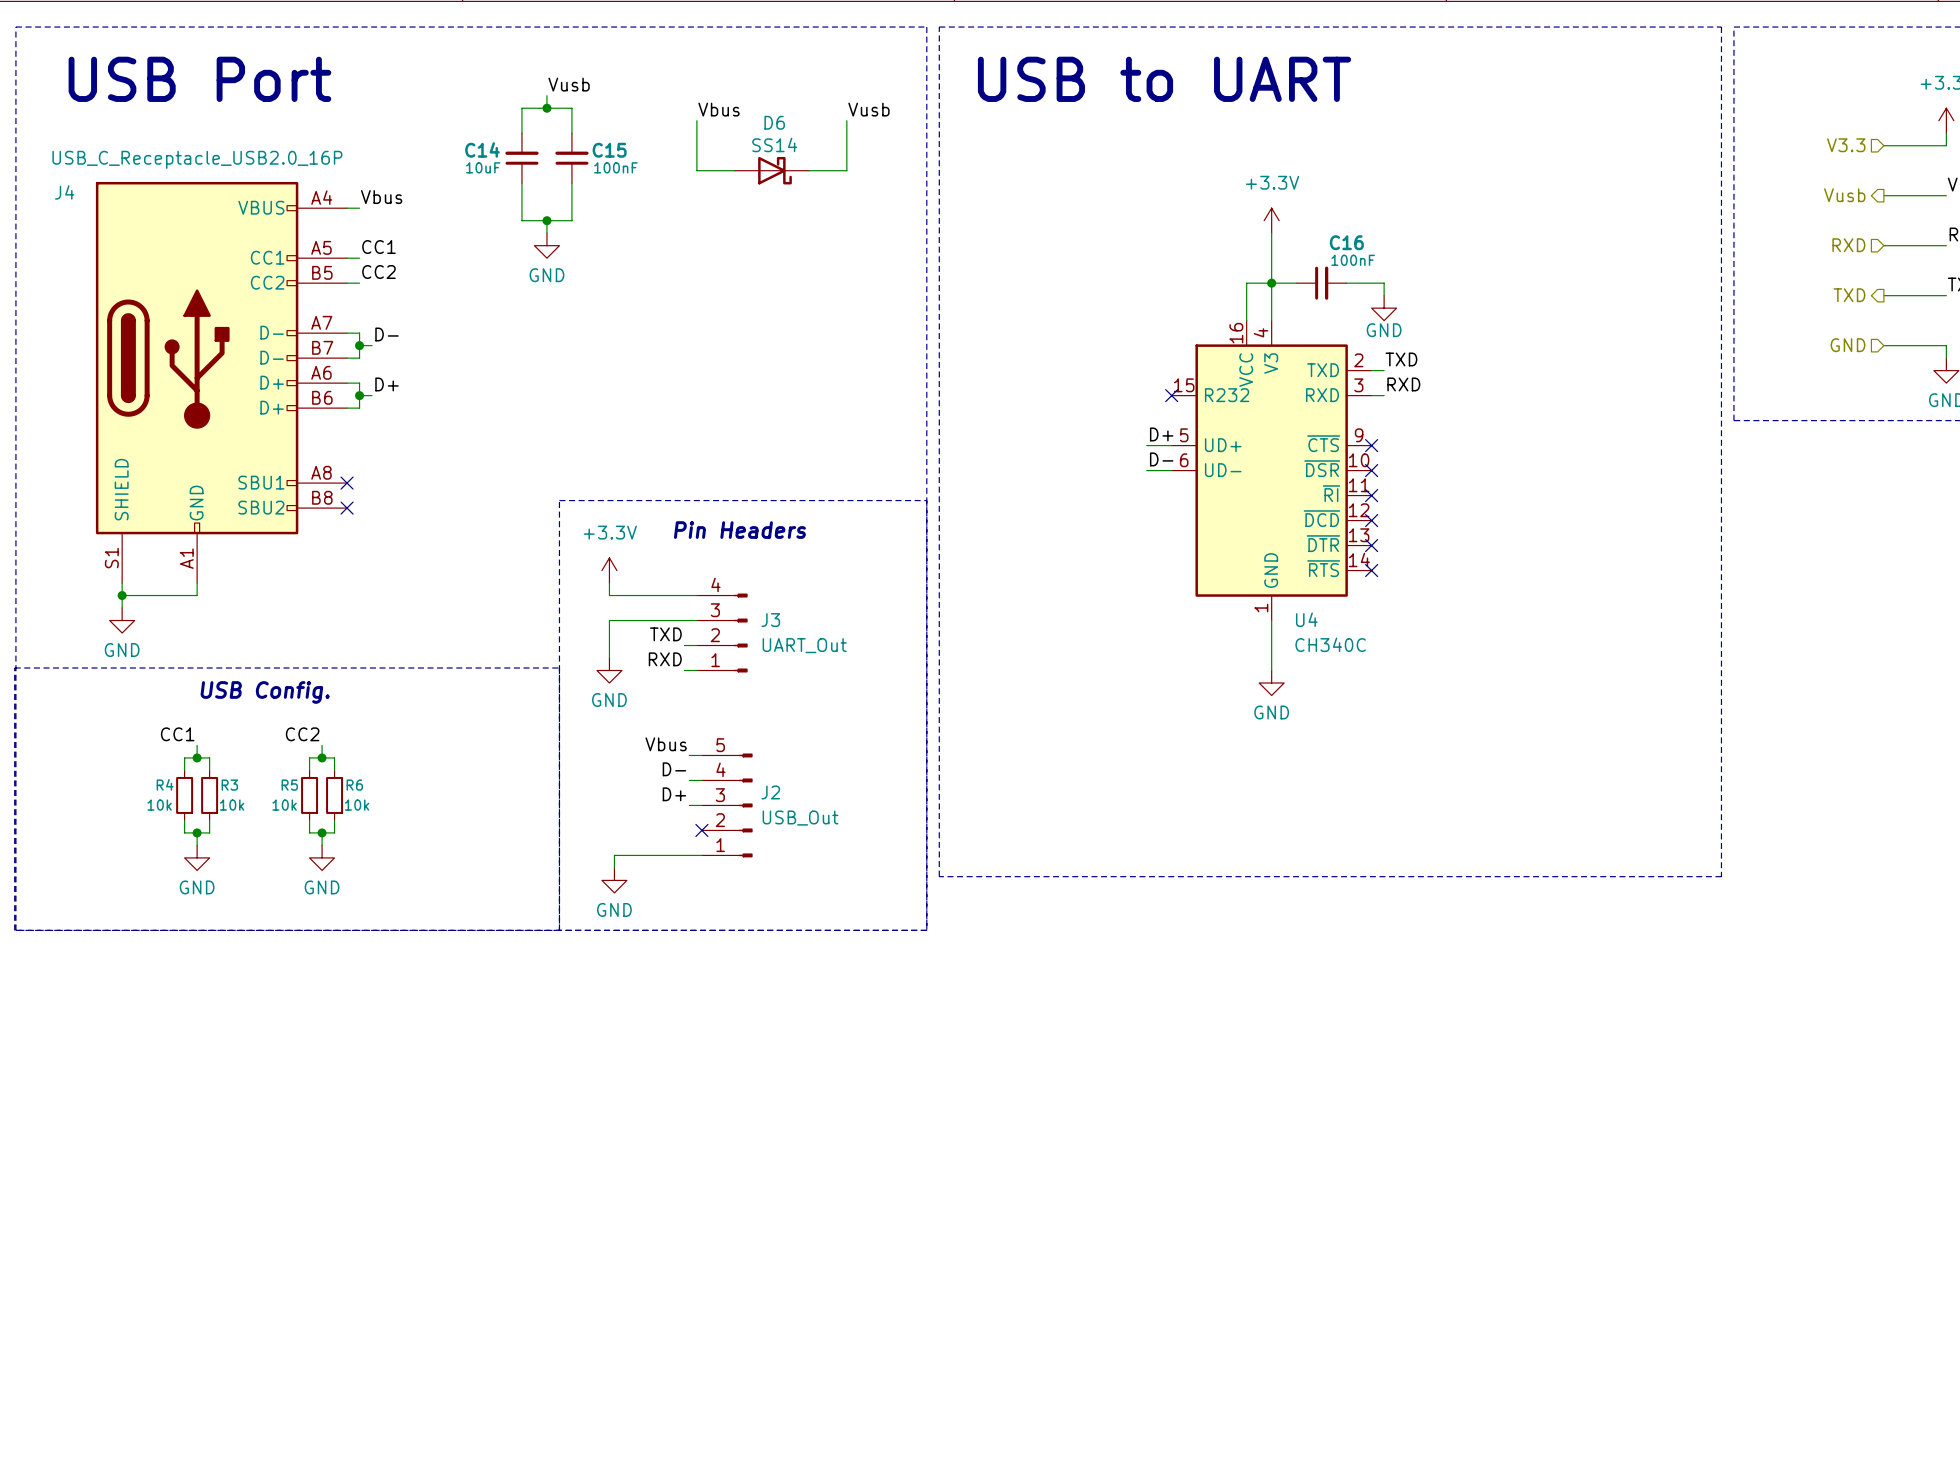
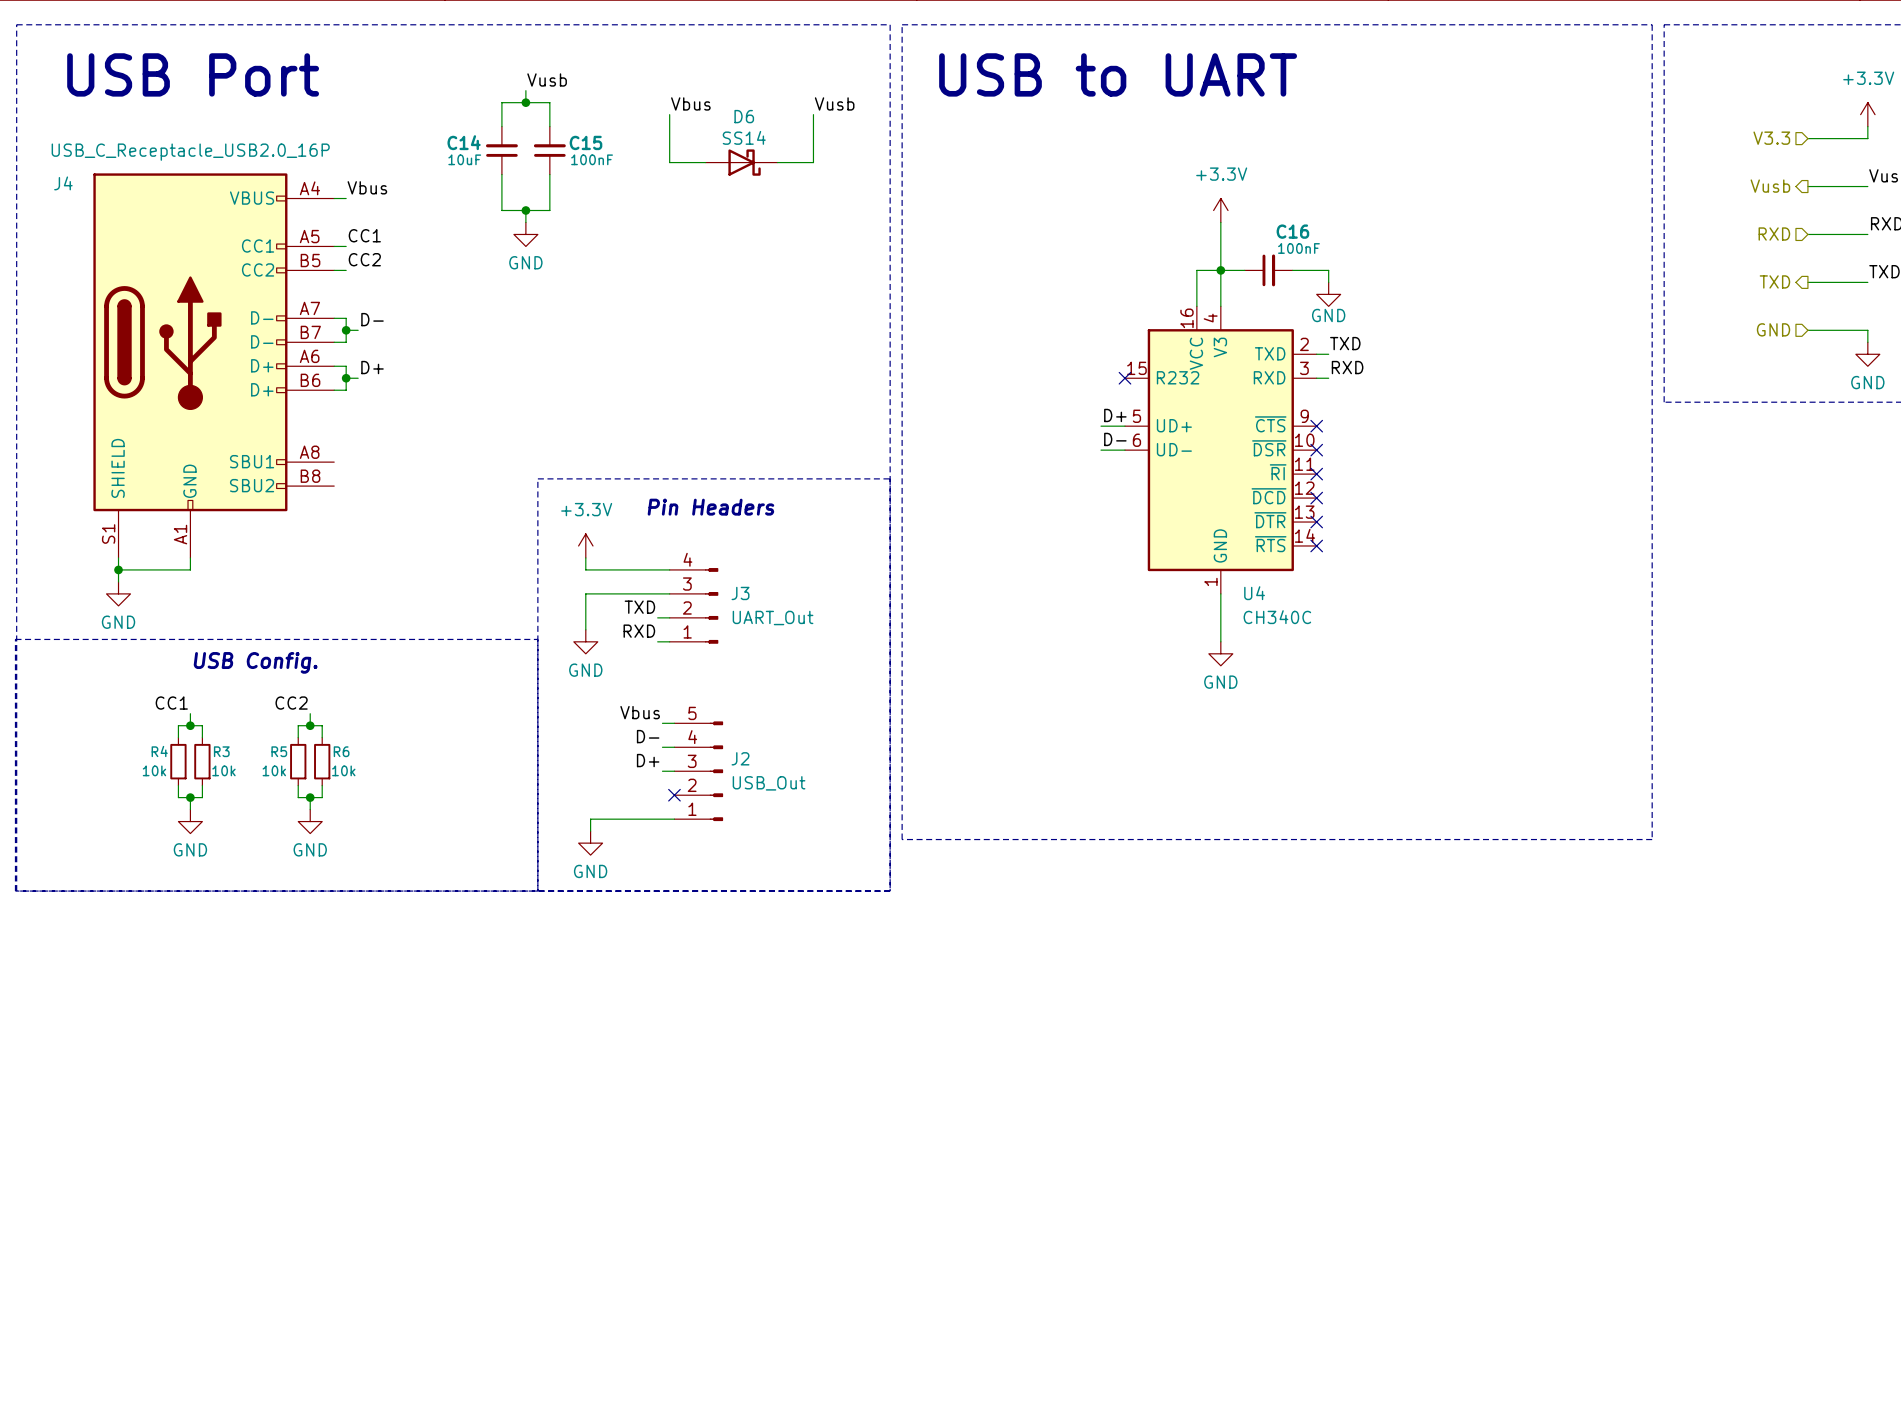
no-connect mark: (347, 483) -> none
no-connect mark: (347, 508) -> none

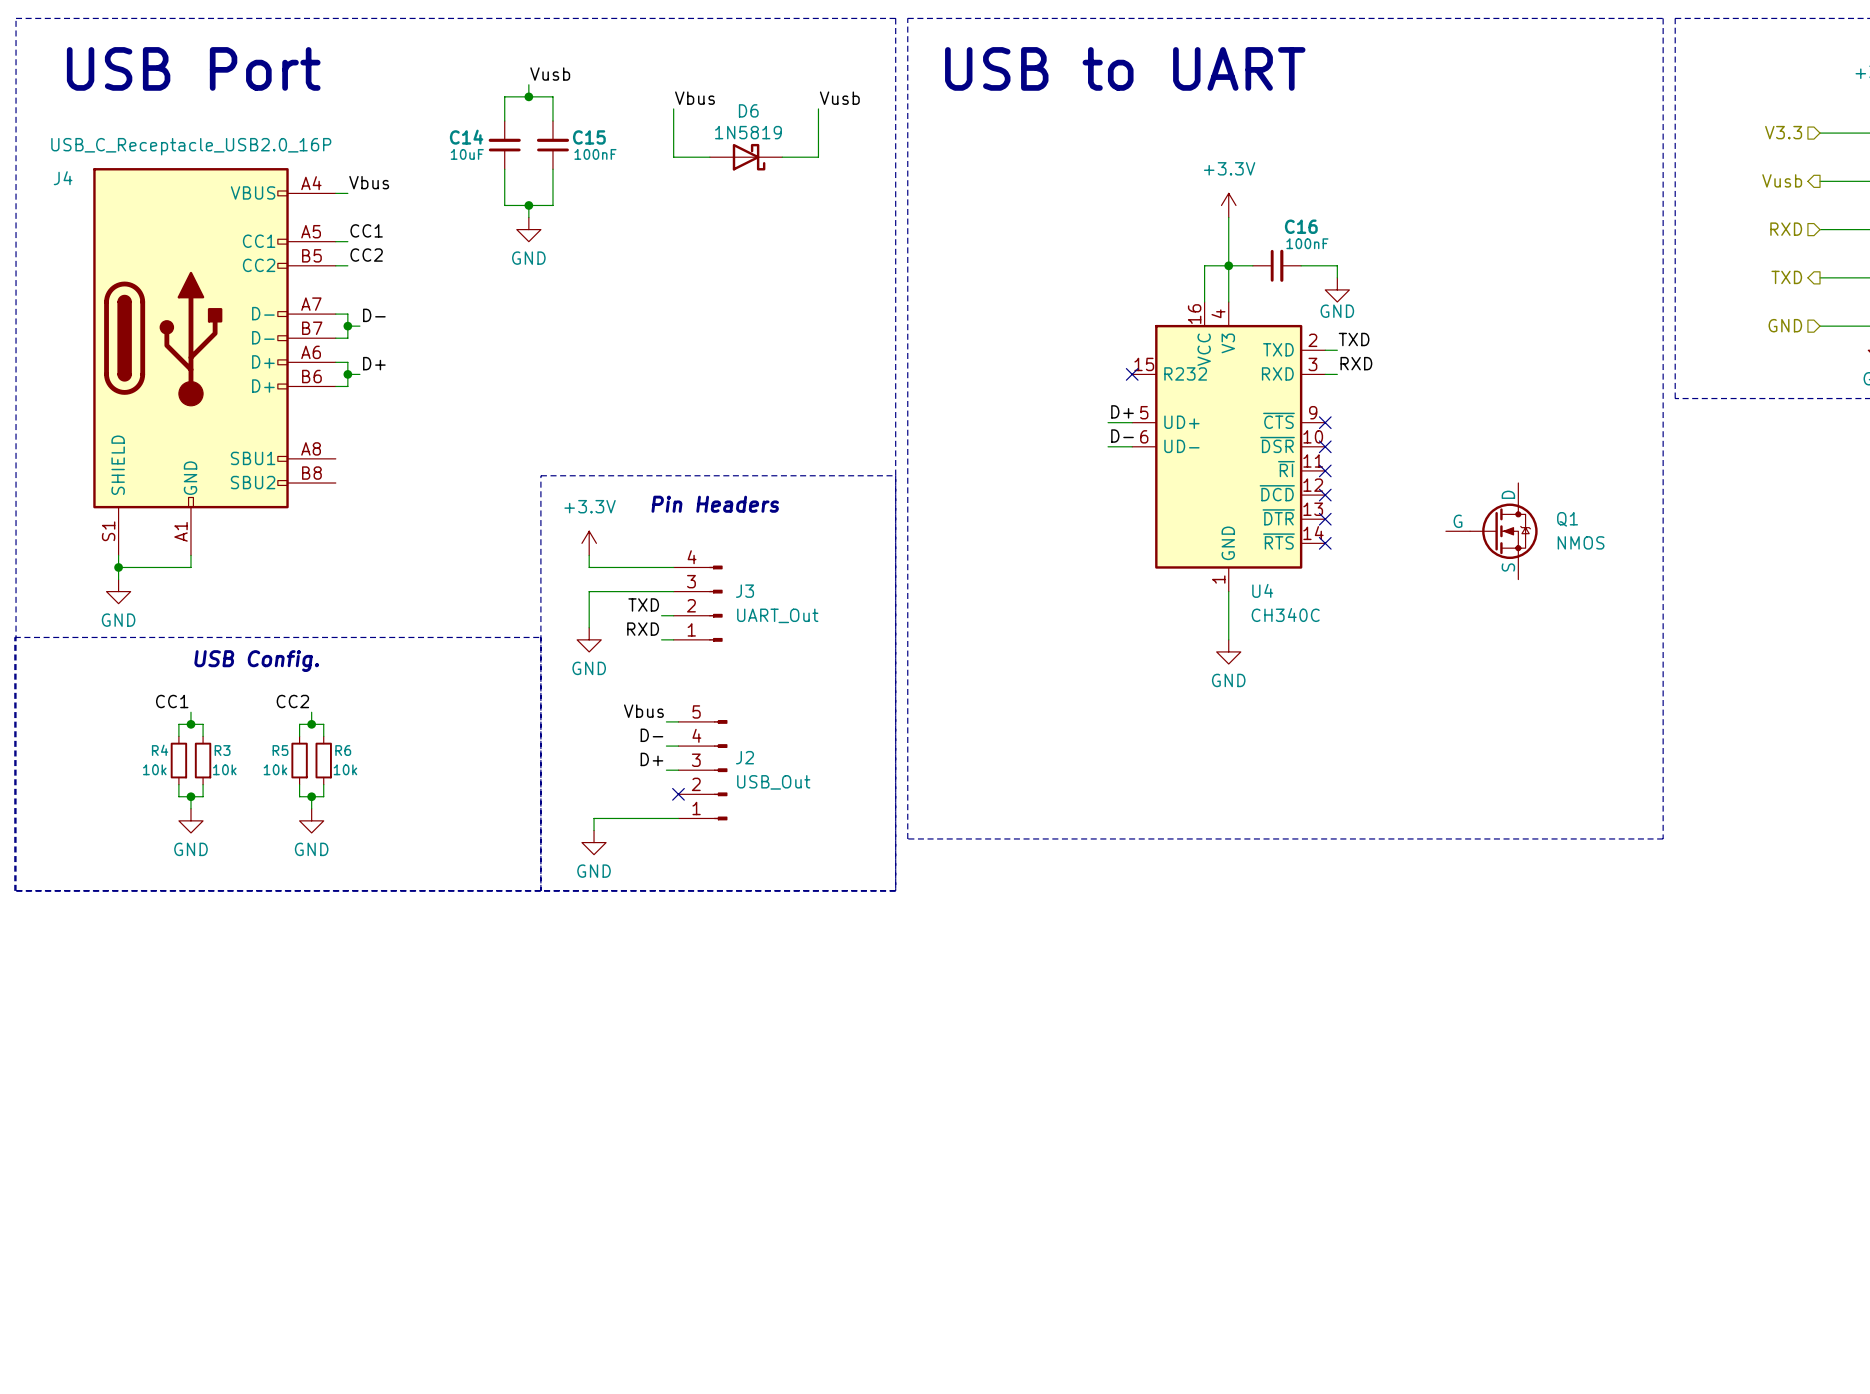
D6 value: SS14 (744, 137) -> 1N5819 (748, 132)
Q1: none -> NMOS (1491, 531)

